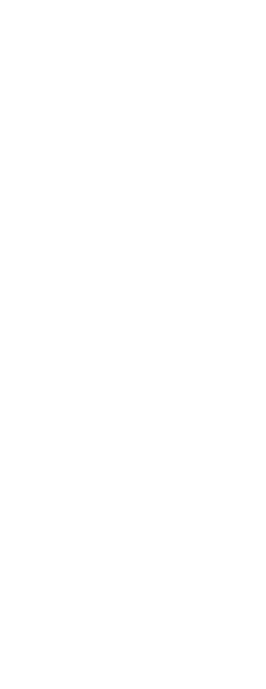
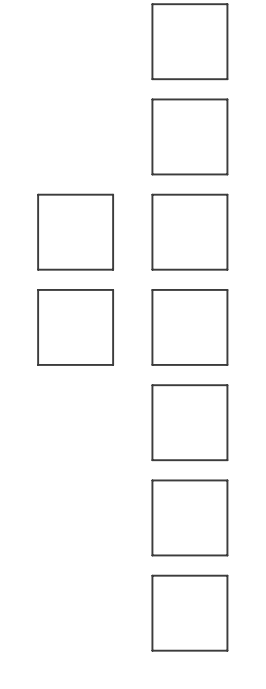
part: none -> (189, 41)
part: none -> (189, 136)
part: none -> (75, 232)
part: none -> (189, 232)
part: none -> (75, 327)
part: none -> (189, 327)
part: none -> (189, 422)
part: none -> (189, 517)
part: none -> (189, 613)

